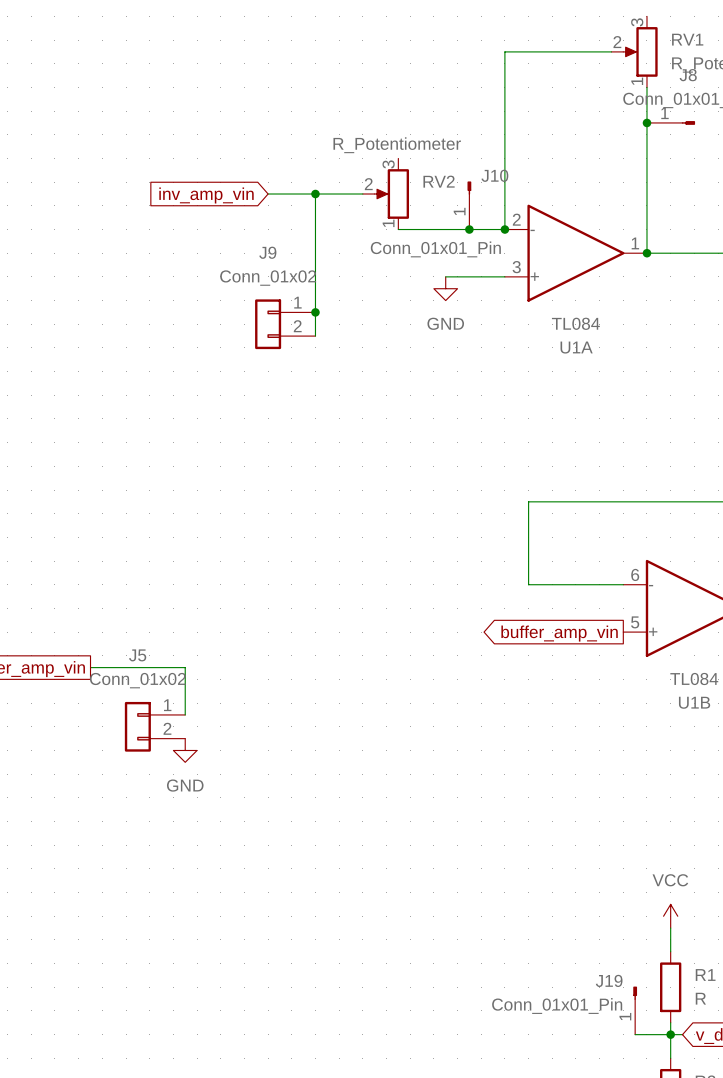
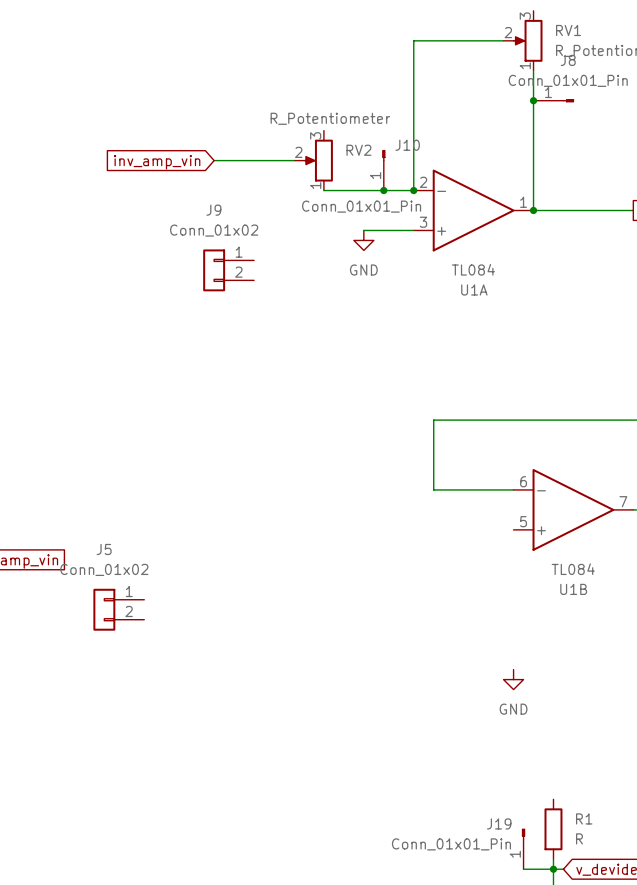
wire: (315, 194) (315, 336) -> none
junction: (315, 194) -> none
junction: (315, 312) -> none
global label: buffer_amp_vin (559, 633) -> none
wire: (90, 667) (185, 667) (185, 714) -> none
power symbol: GND (185, 750) -> none
power symbol: none -> GND (513, 679)
power symbol: VCC (670, 916) -> none
wire: (670, 928) (670, 951) -> none

